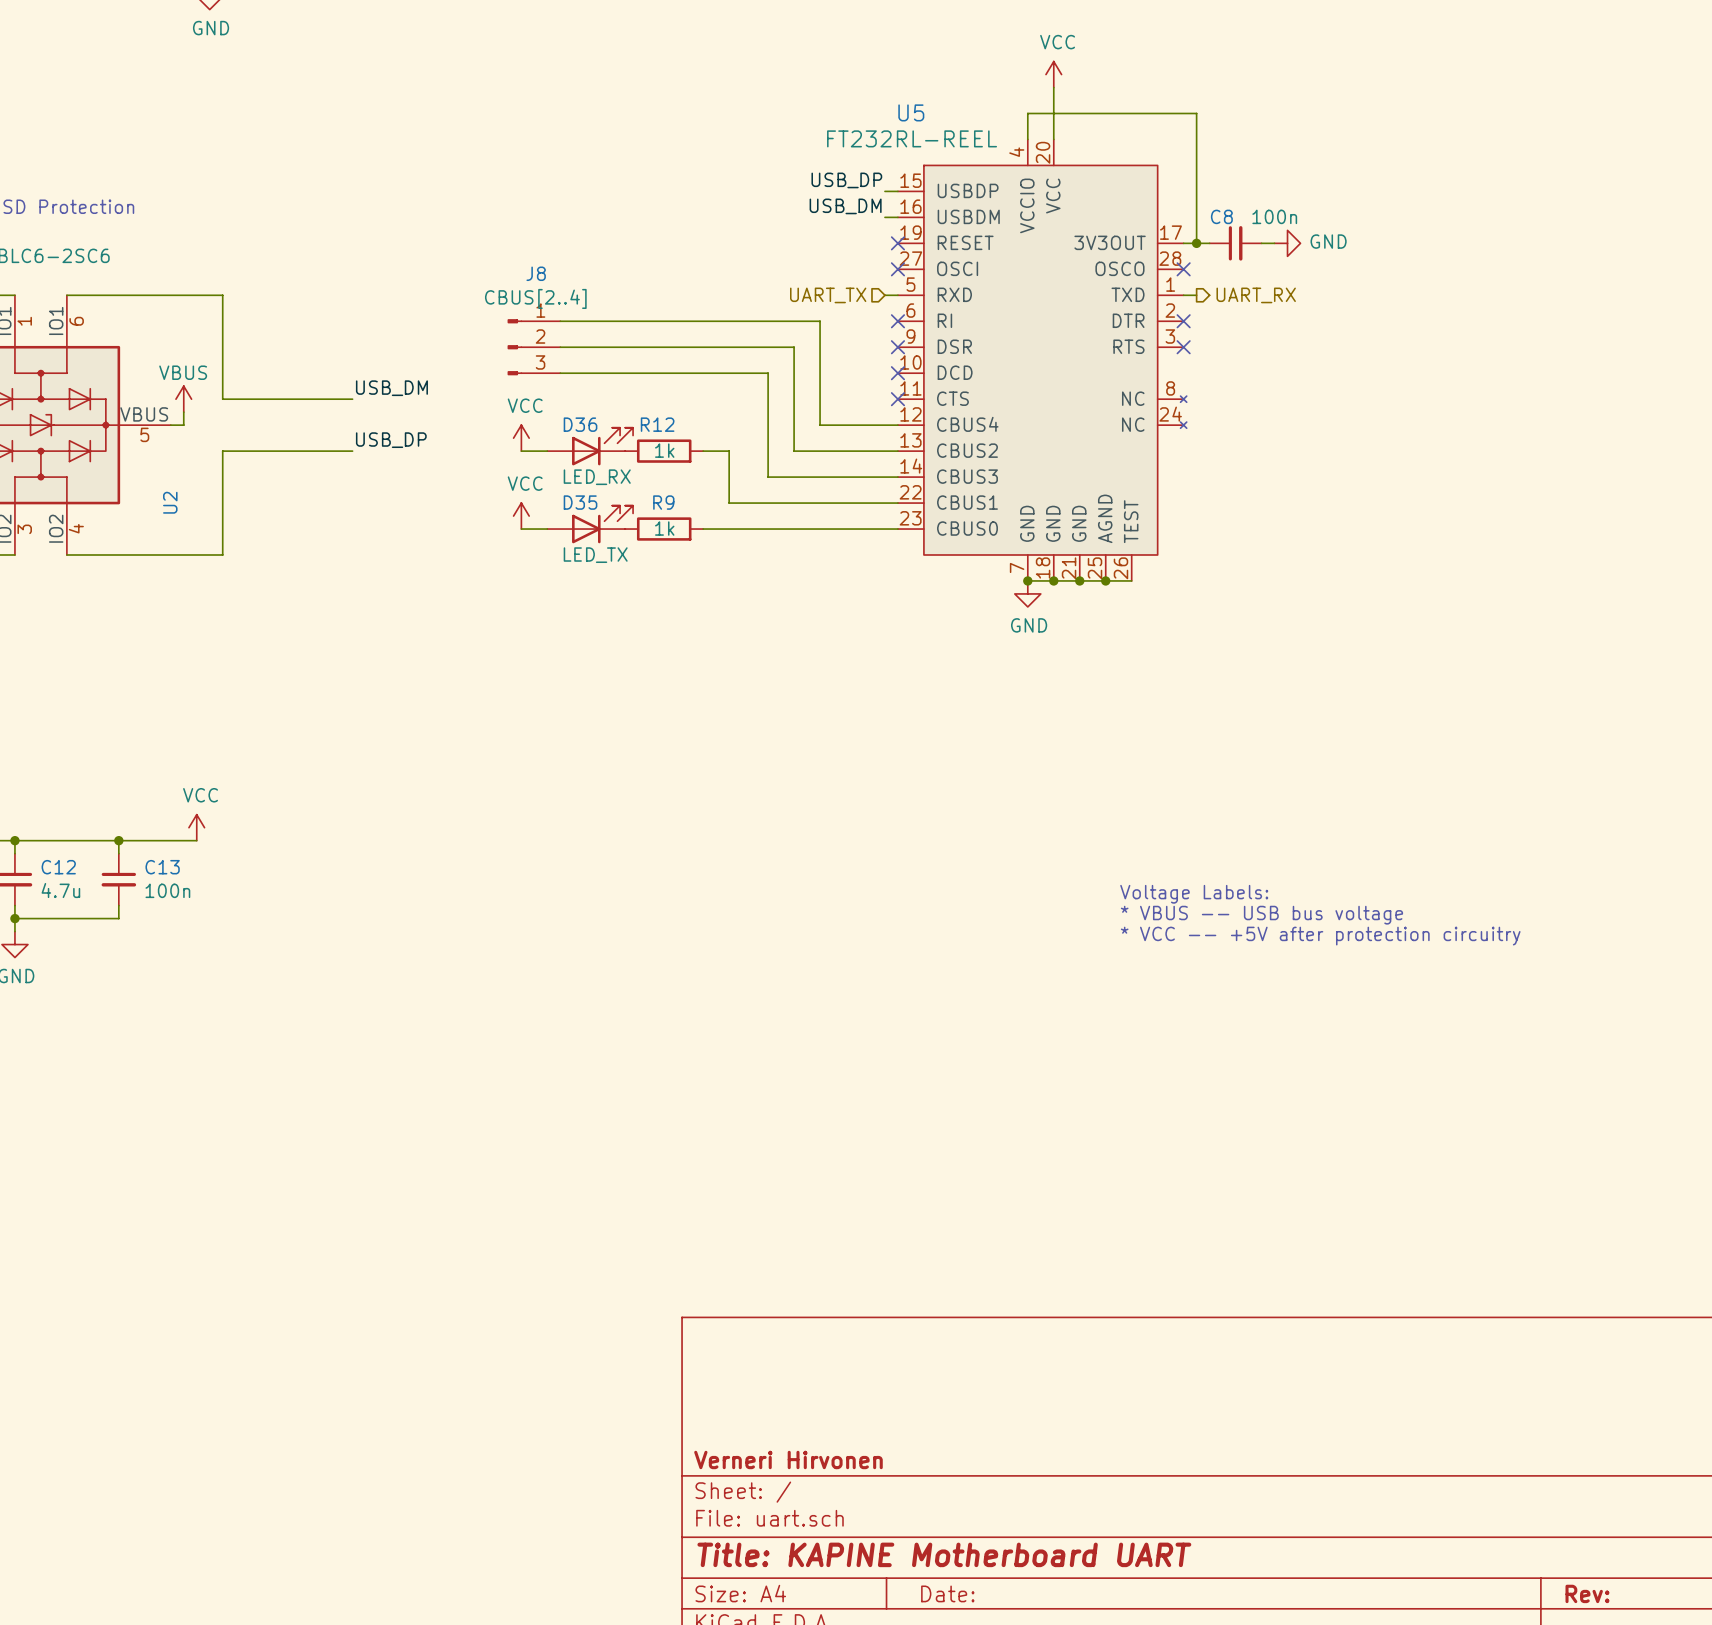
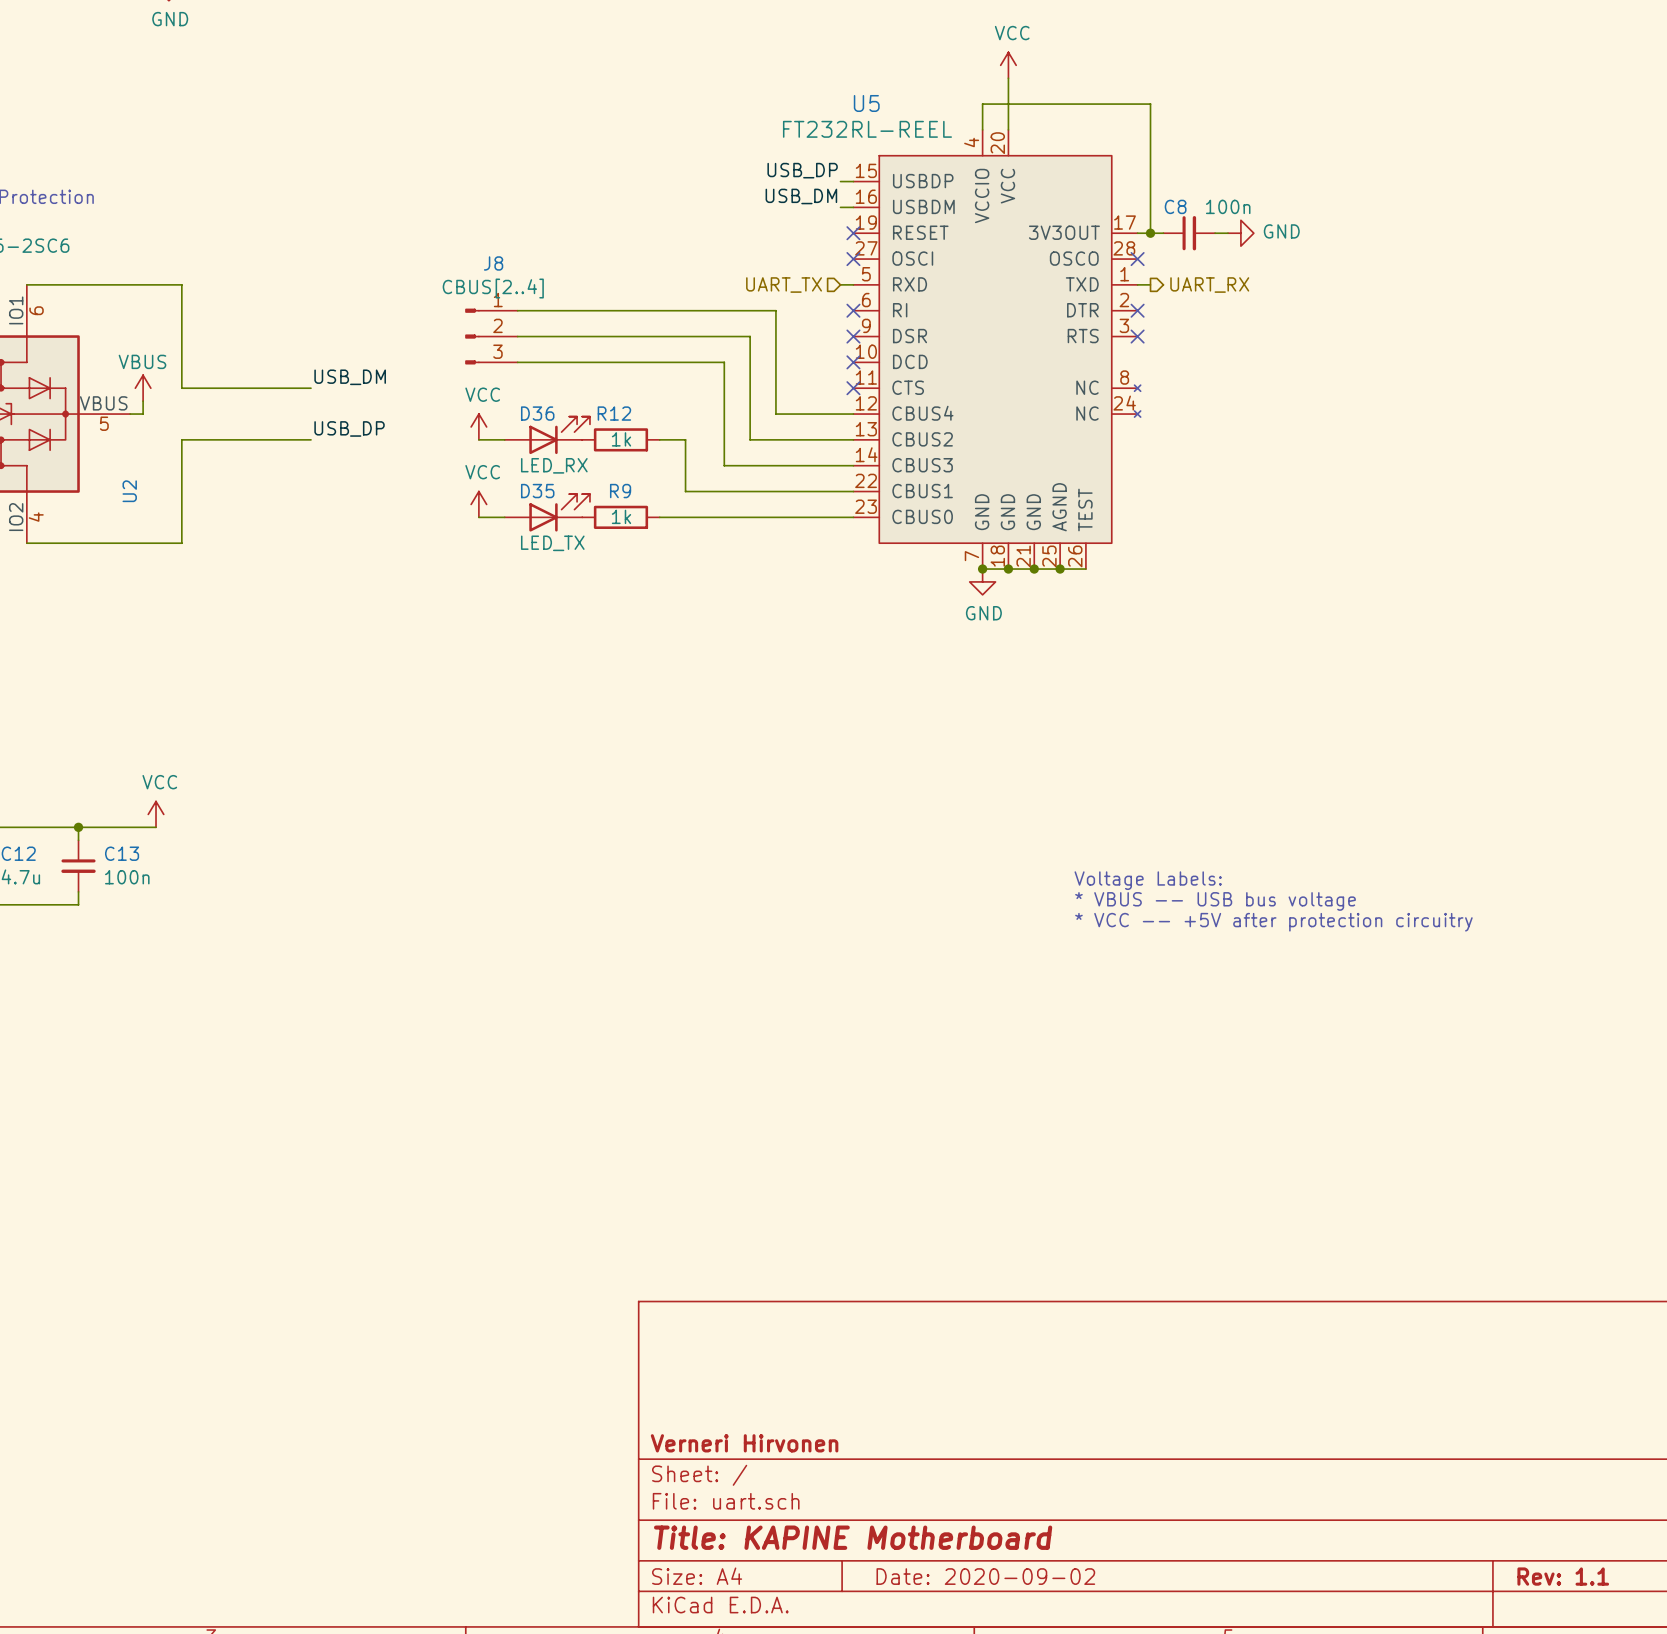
title block: Title: KAPINE Motherboard UART (944, 1554) -> Title: KAPINE Motherboard (853, 1537)
title block: Date: (947, 1593) -> Date: 2020-09-02 (985, 1576)
title block: Rev: (1587, 1593) -> Rev: 1.1 (1563, 1576)

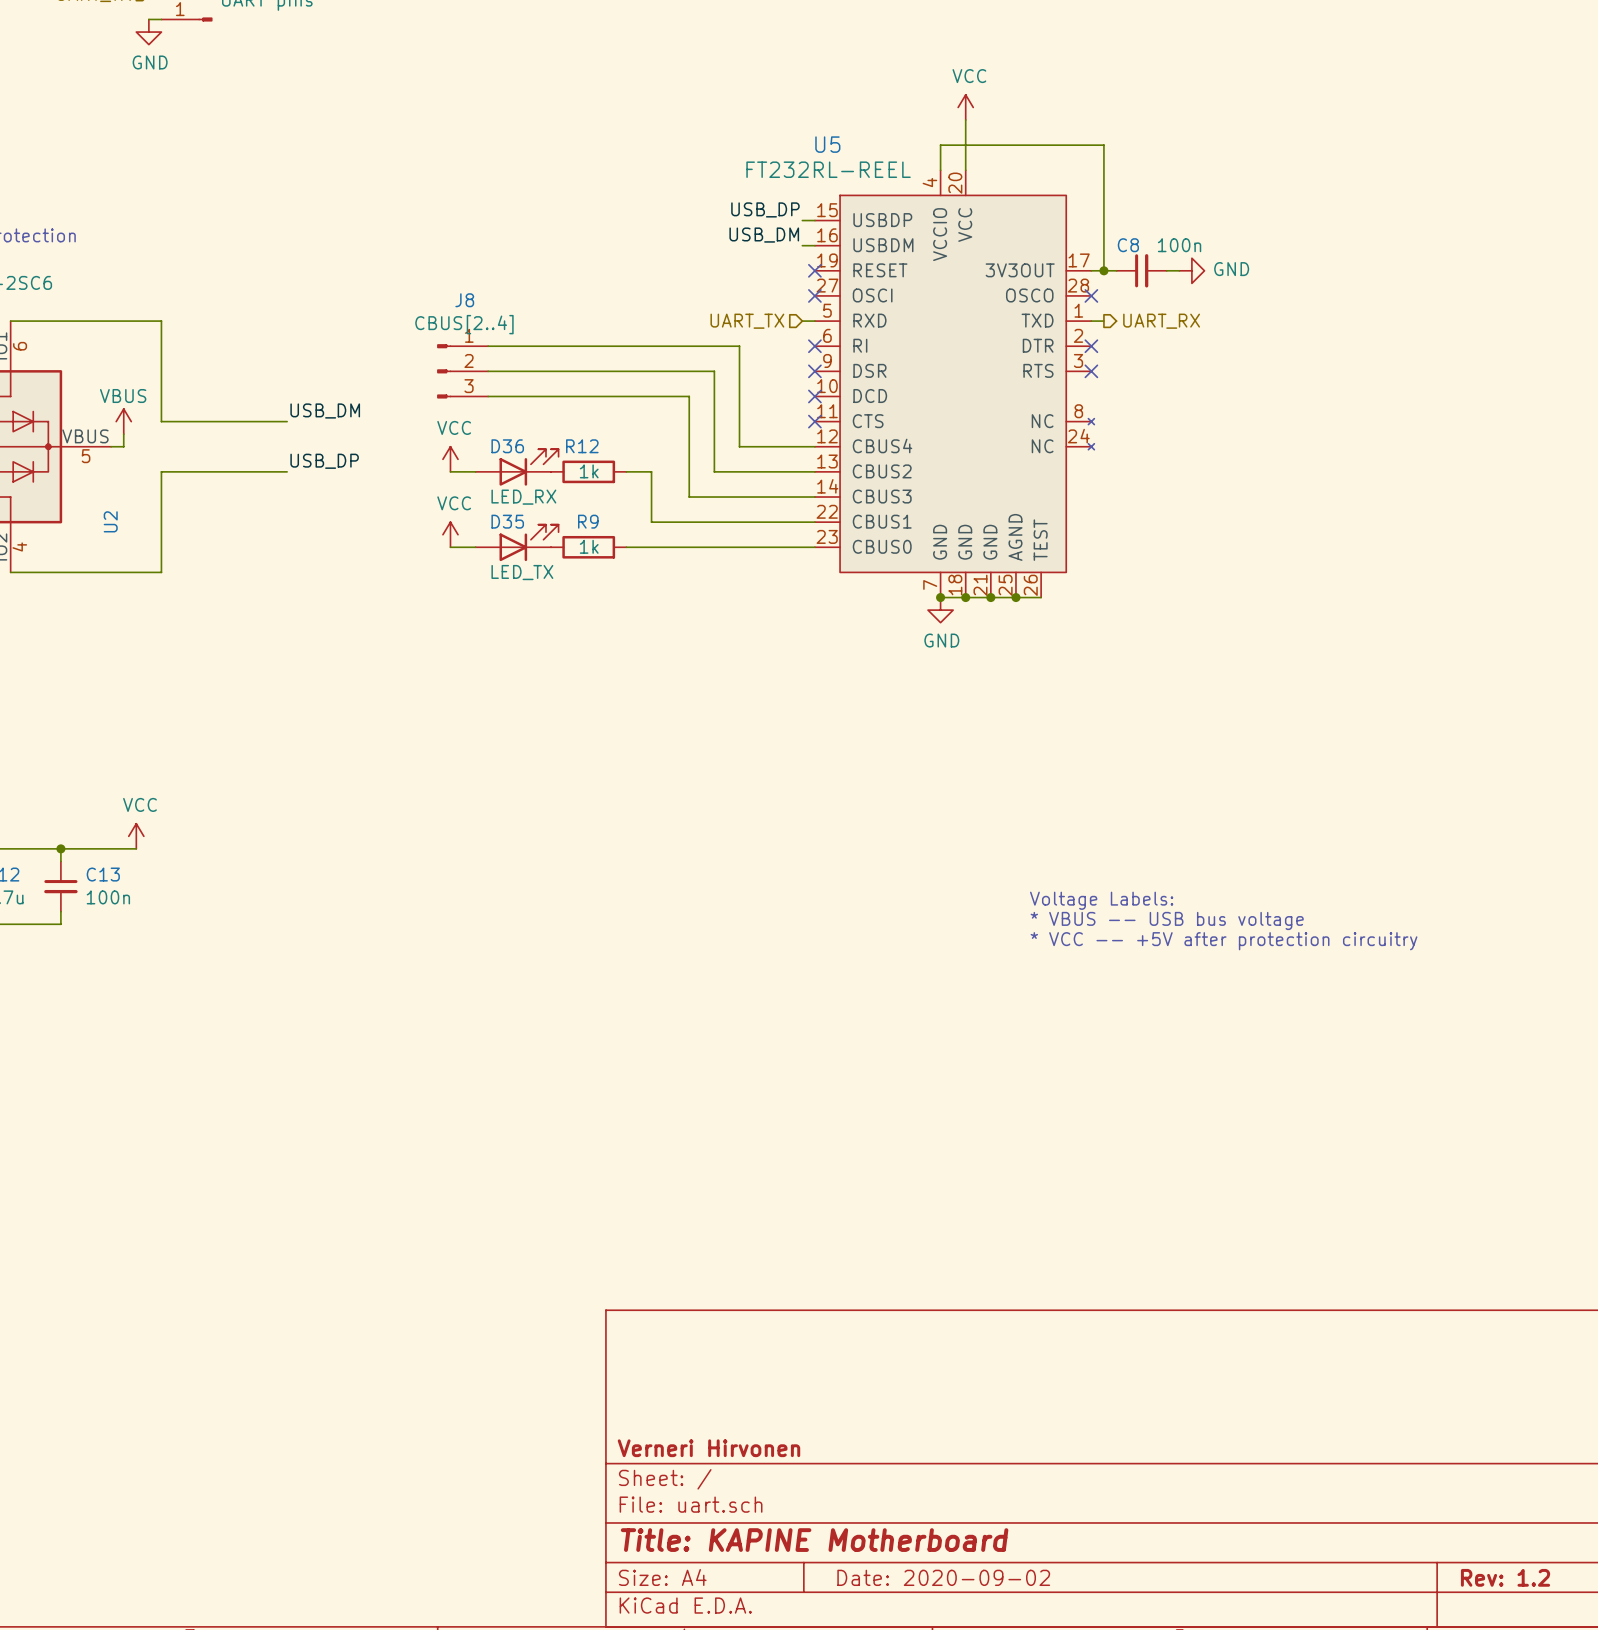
title block: Rev: 1.1 (1563, 1576) -> Rev: 1.2 (1505, 1577)

